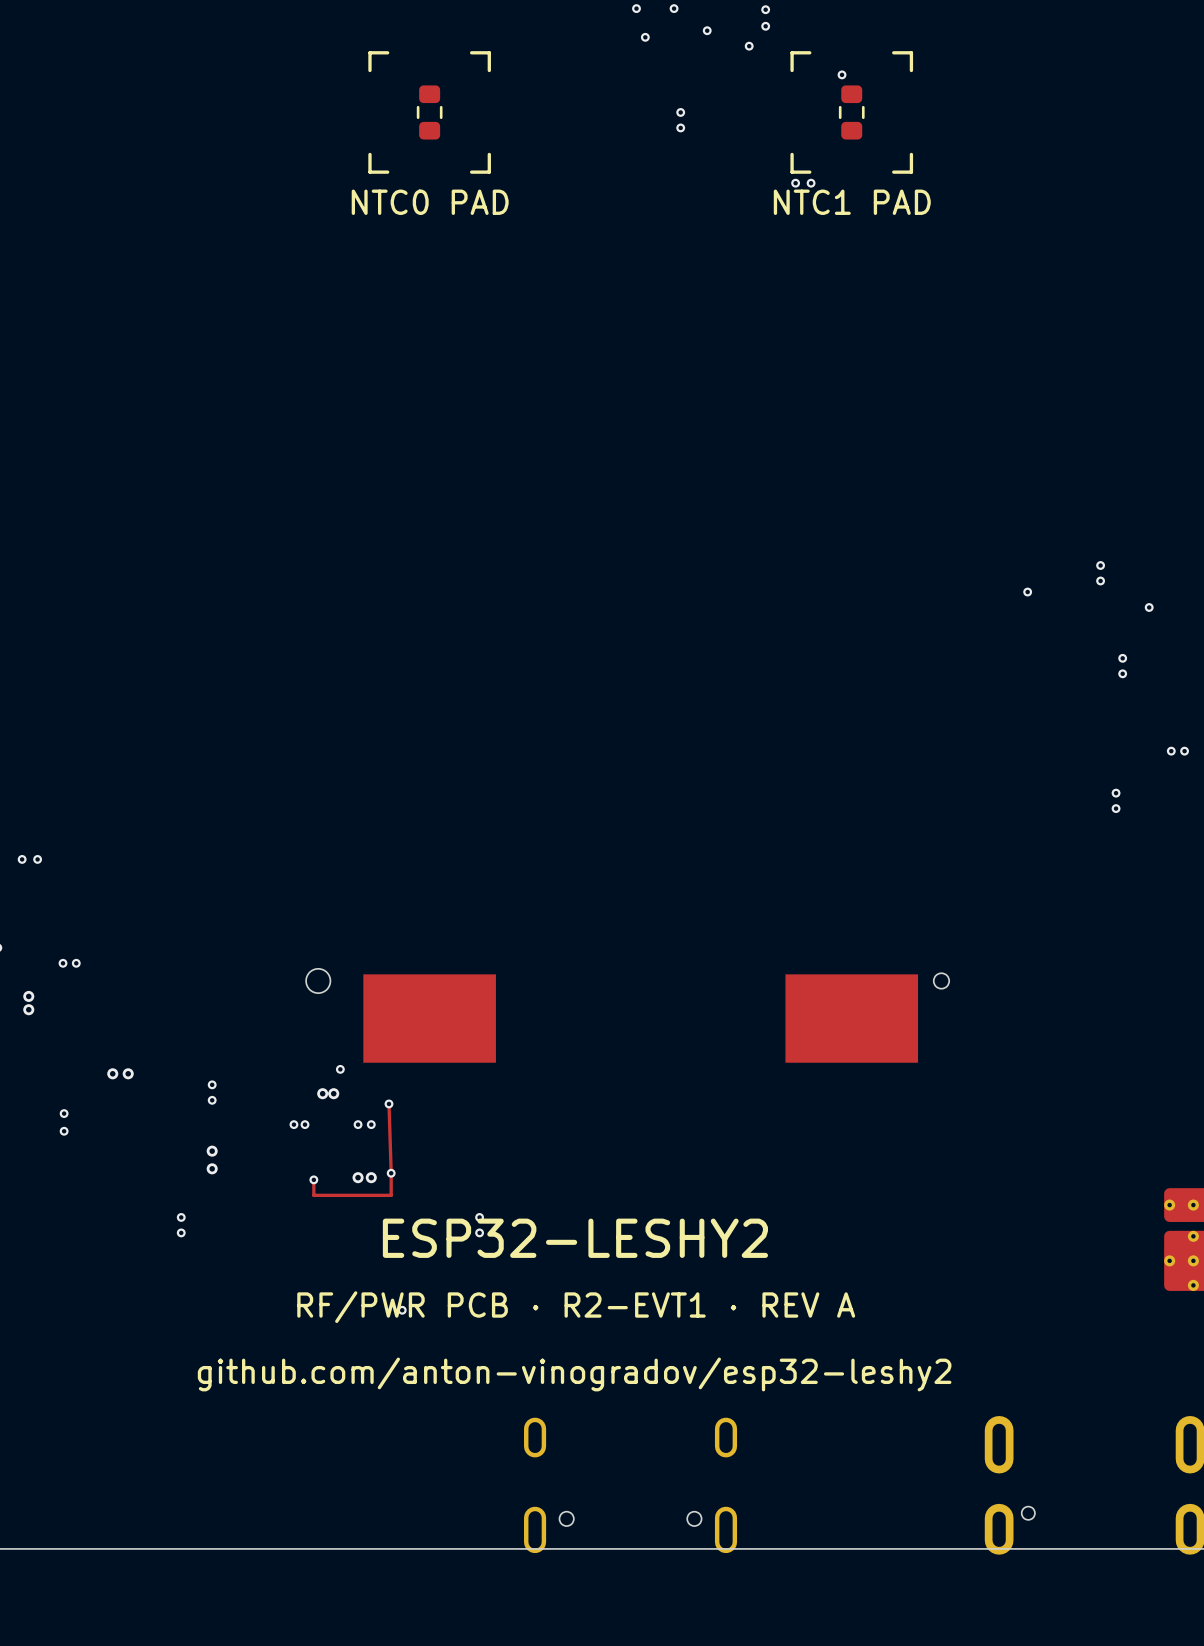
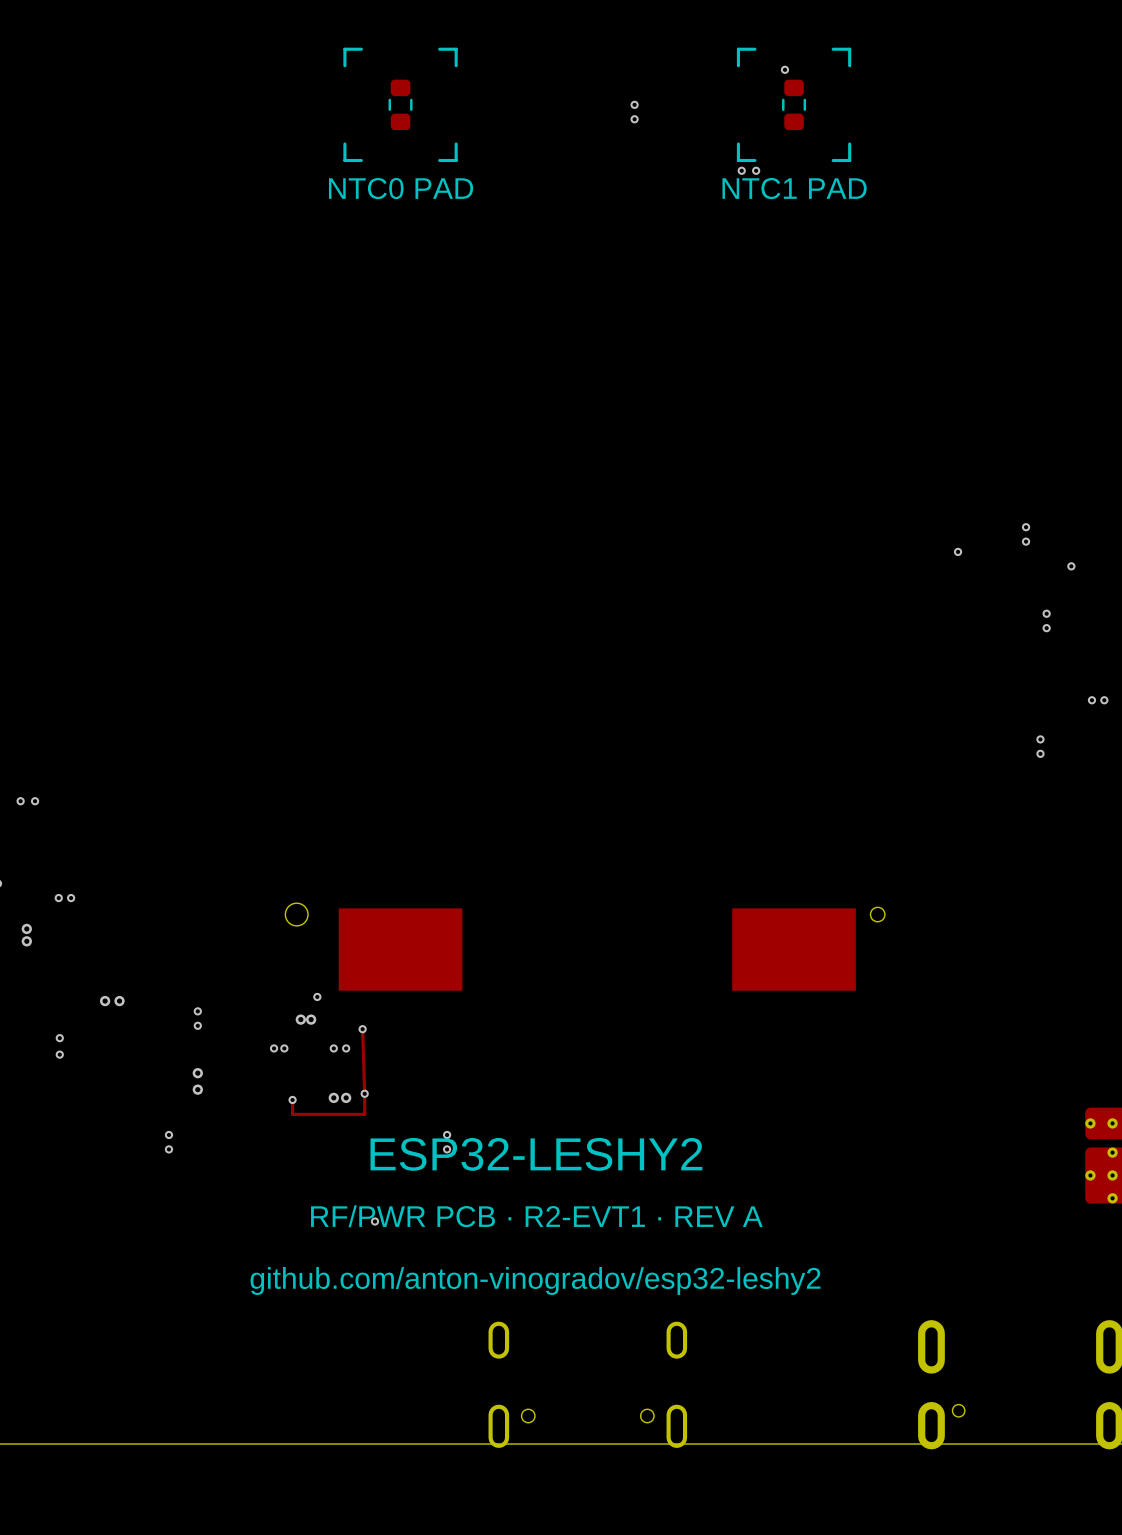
via: (636, 8) -> none
via: (674, 8) -> none
via: (765, 9) -> none
via: (765, 26) -> none
via: (707, 30) -> none
via: (645, 37) -> none
via: (749, 46) -> none

